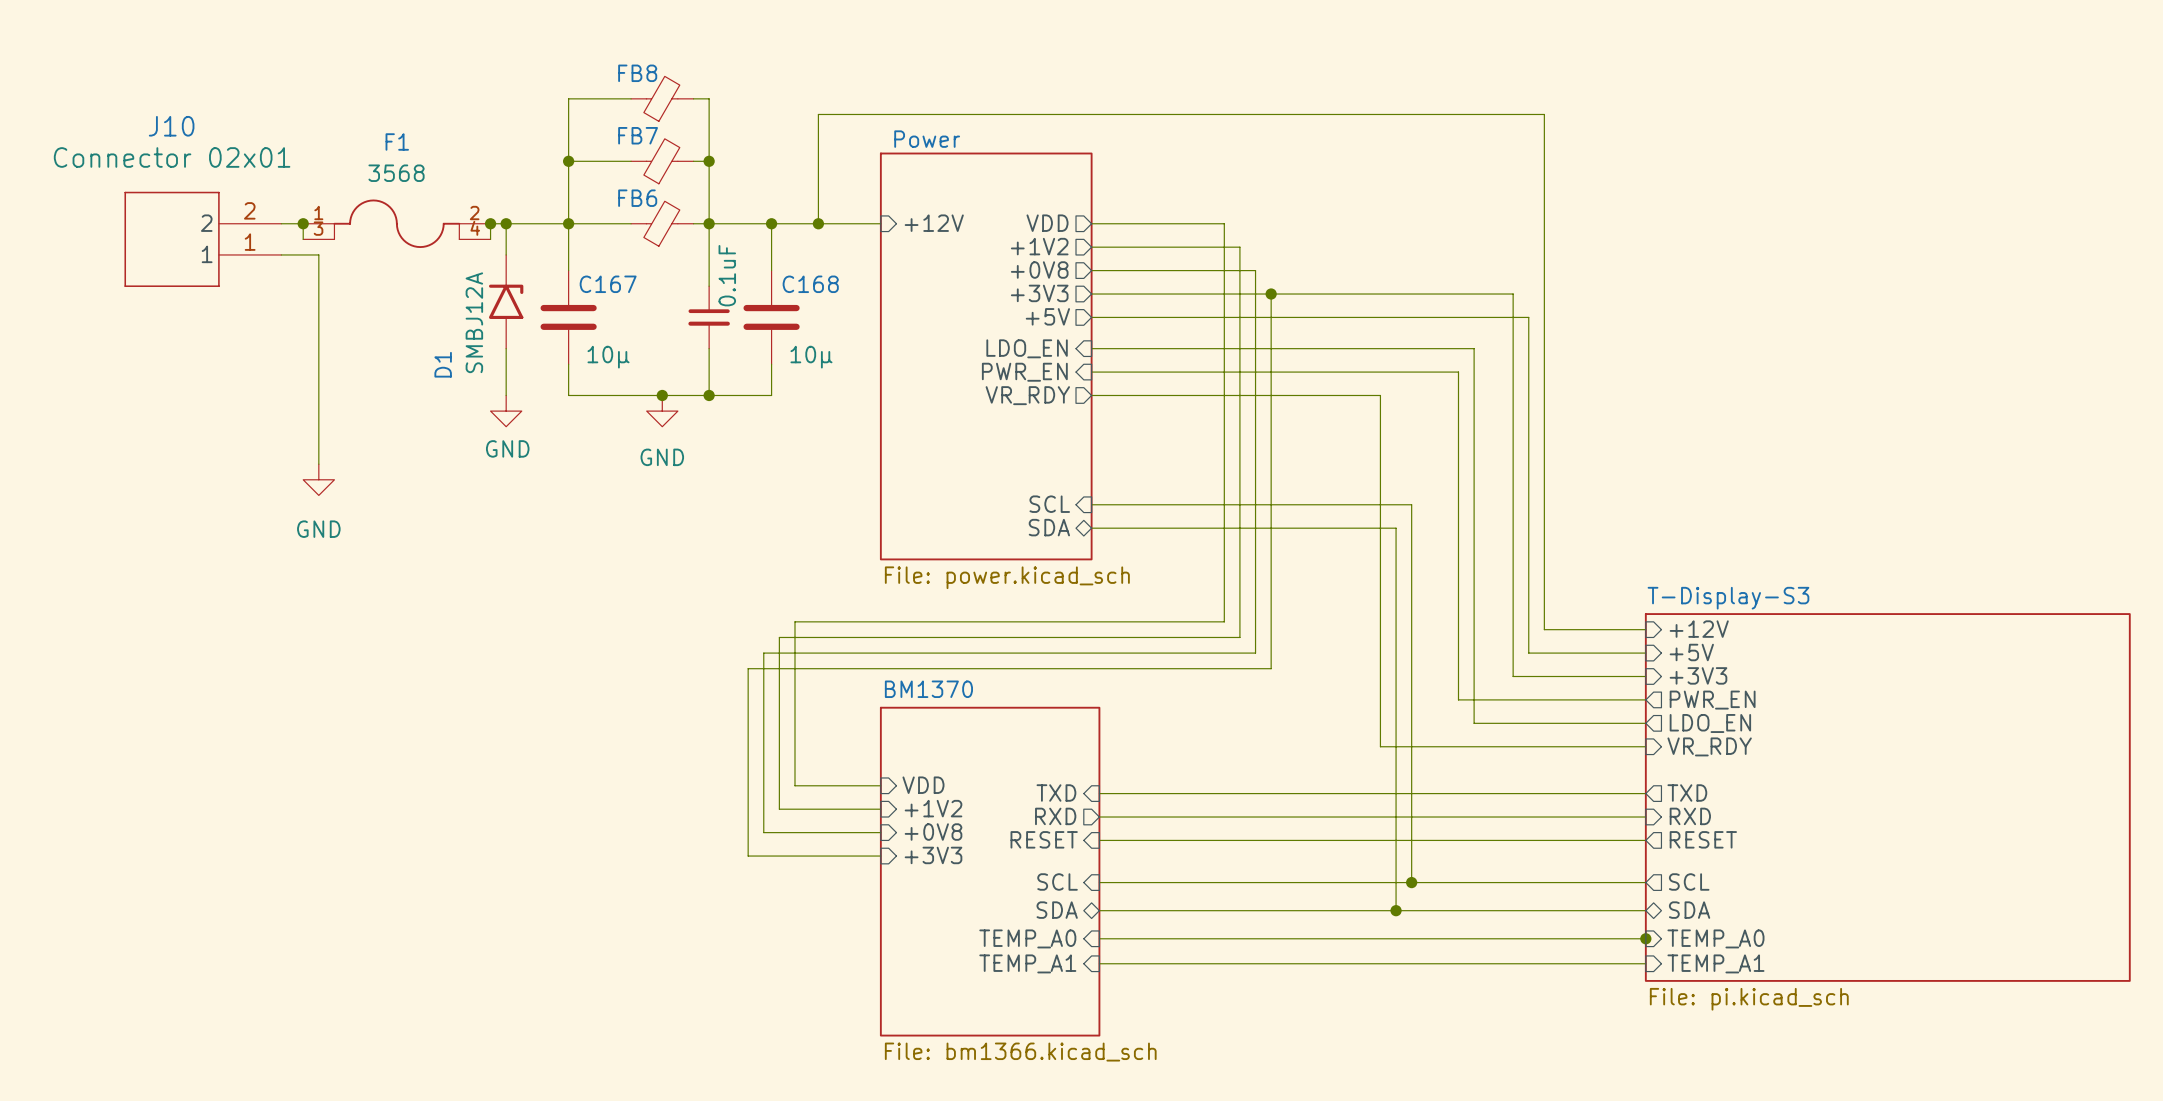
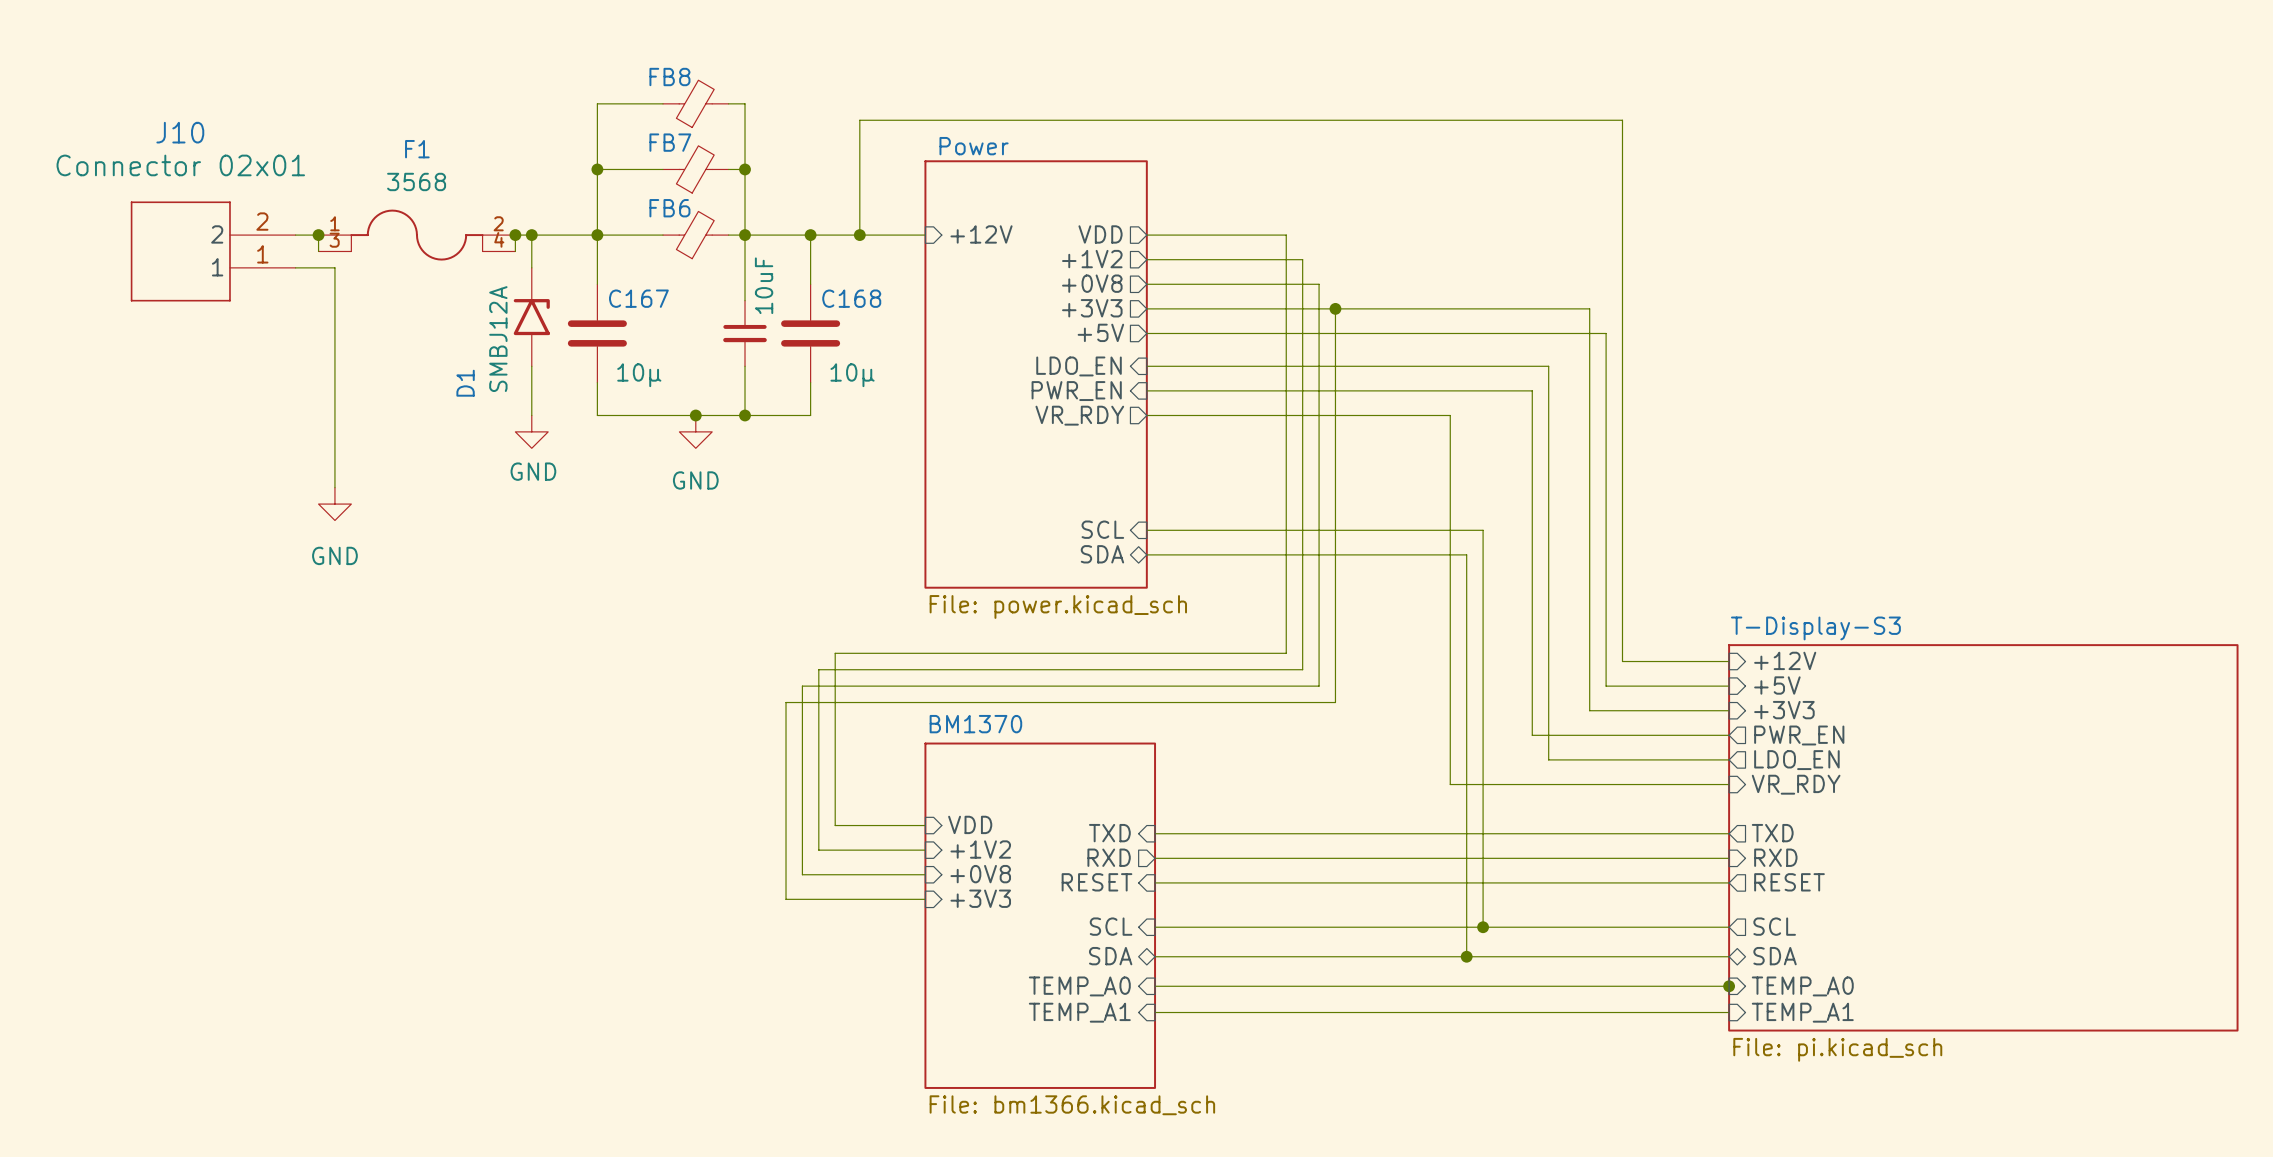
part value: 0.1uF (727, 275) -> 10uF (764, 285)

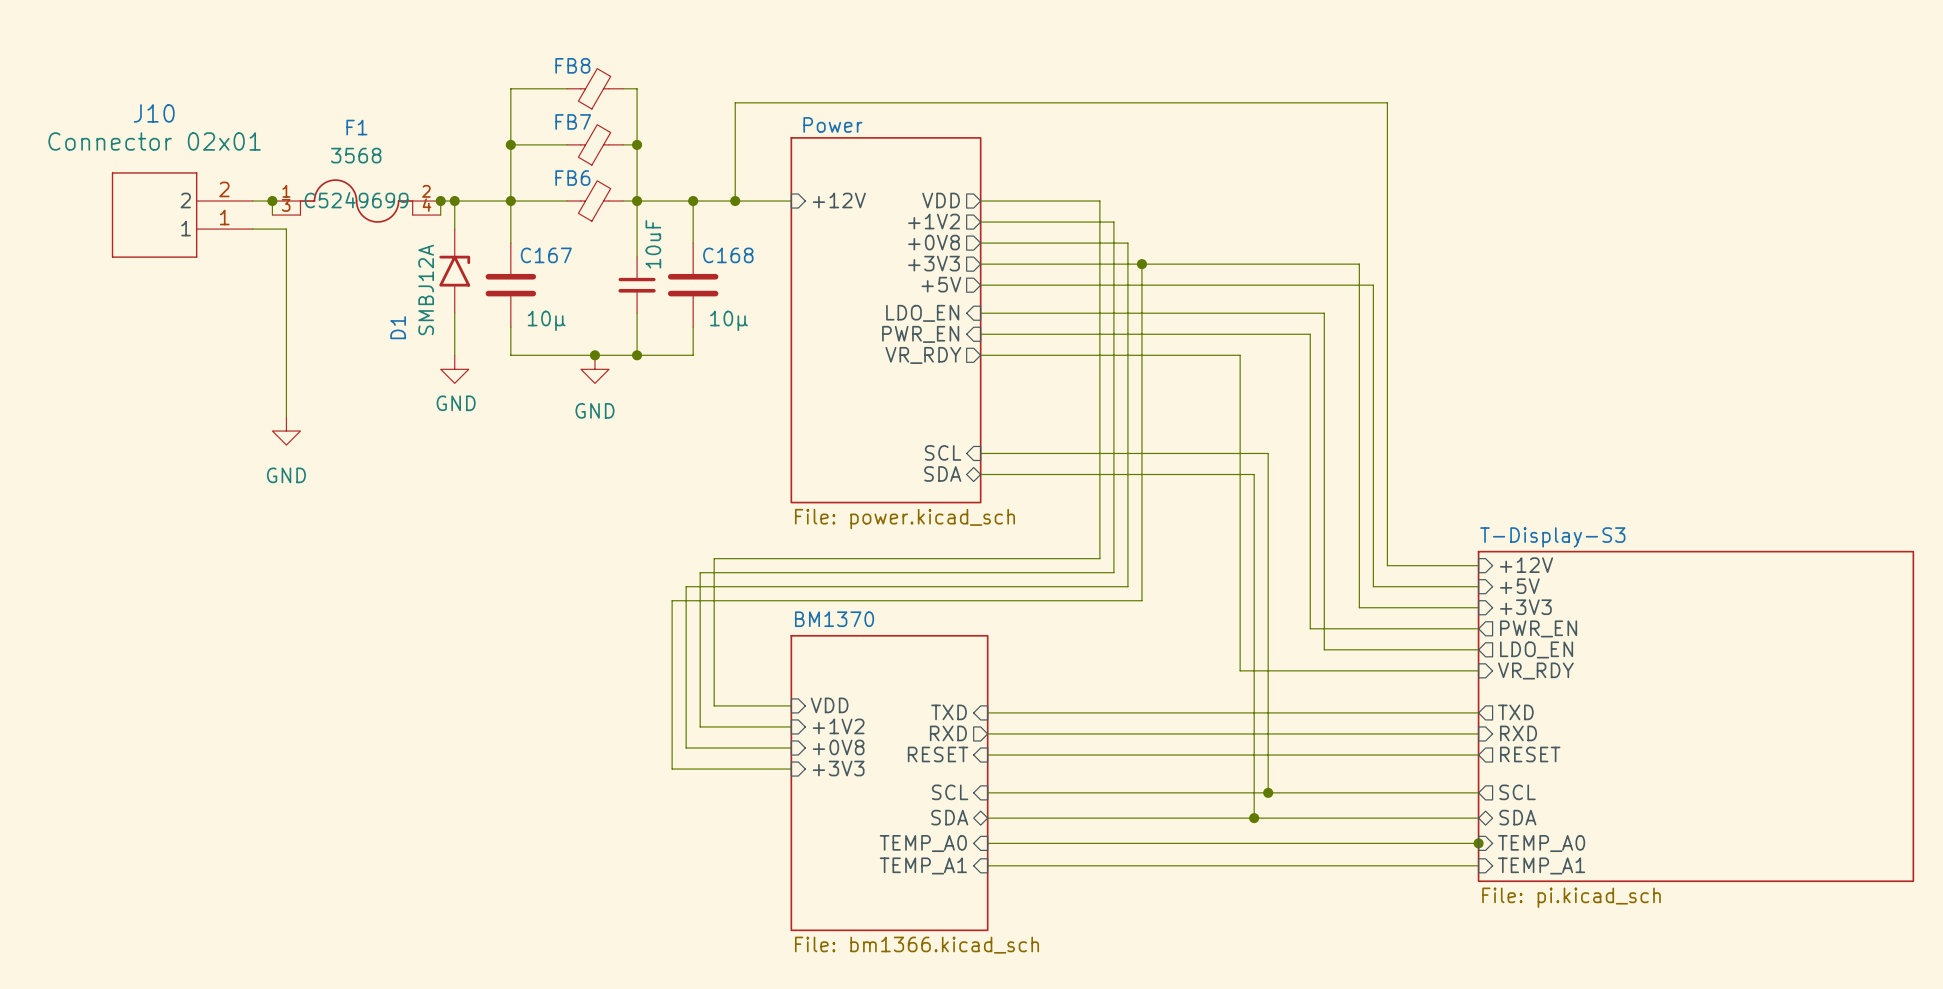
F1 text: none -> C5249699 (356, 200)

